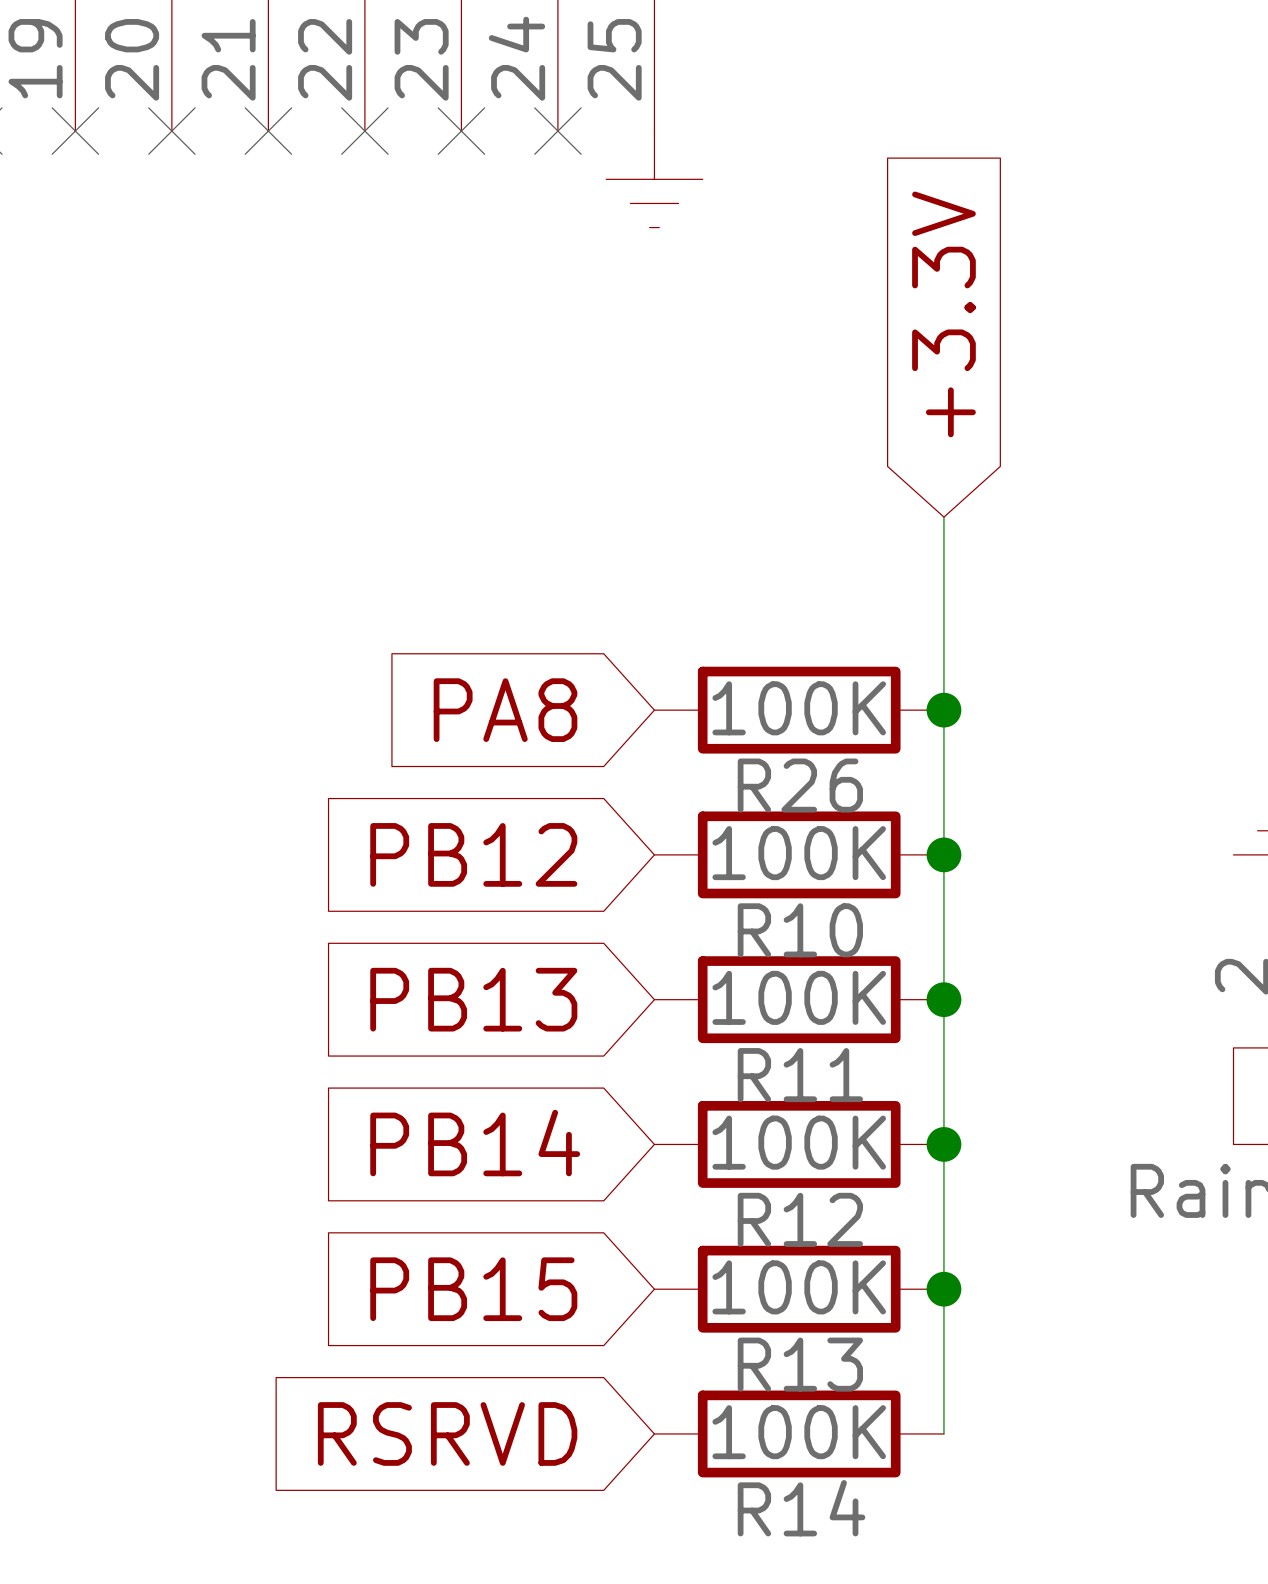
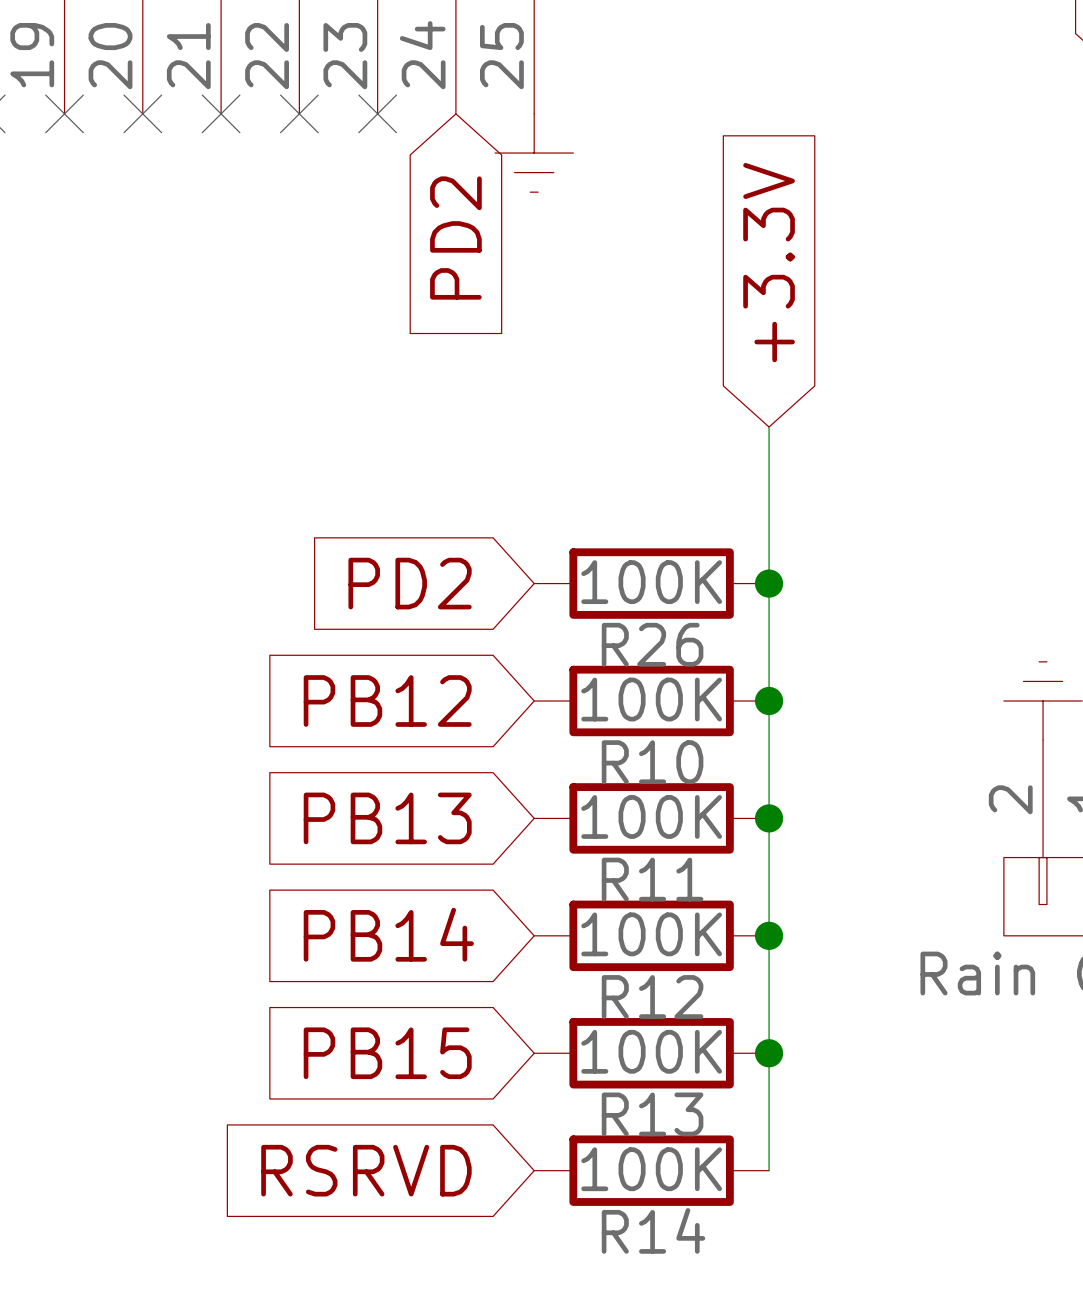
no-connect mark: (557, 131) -> none
global label: none -> PD2 (455, 238)
global label: PA8 (505, 710) -> PD2 (410, 583)

